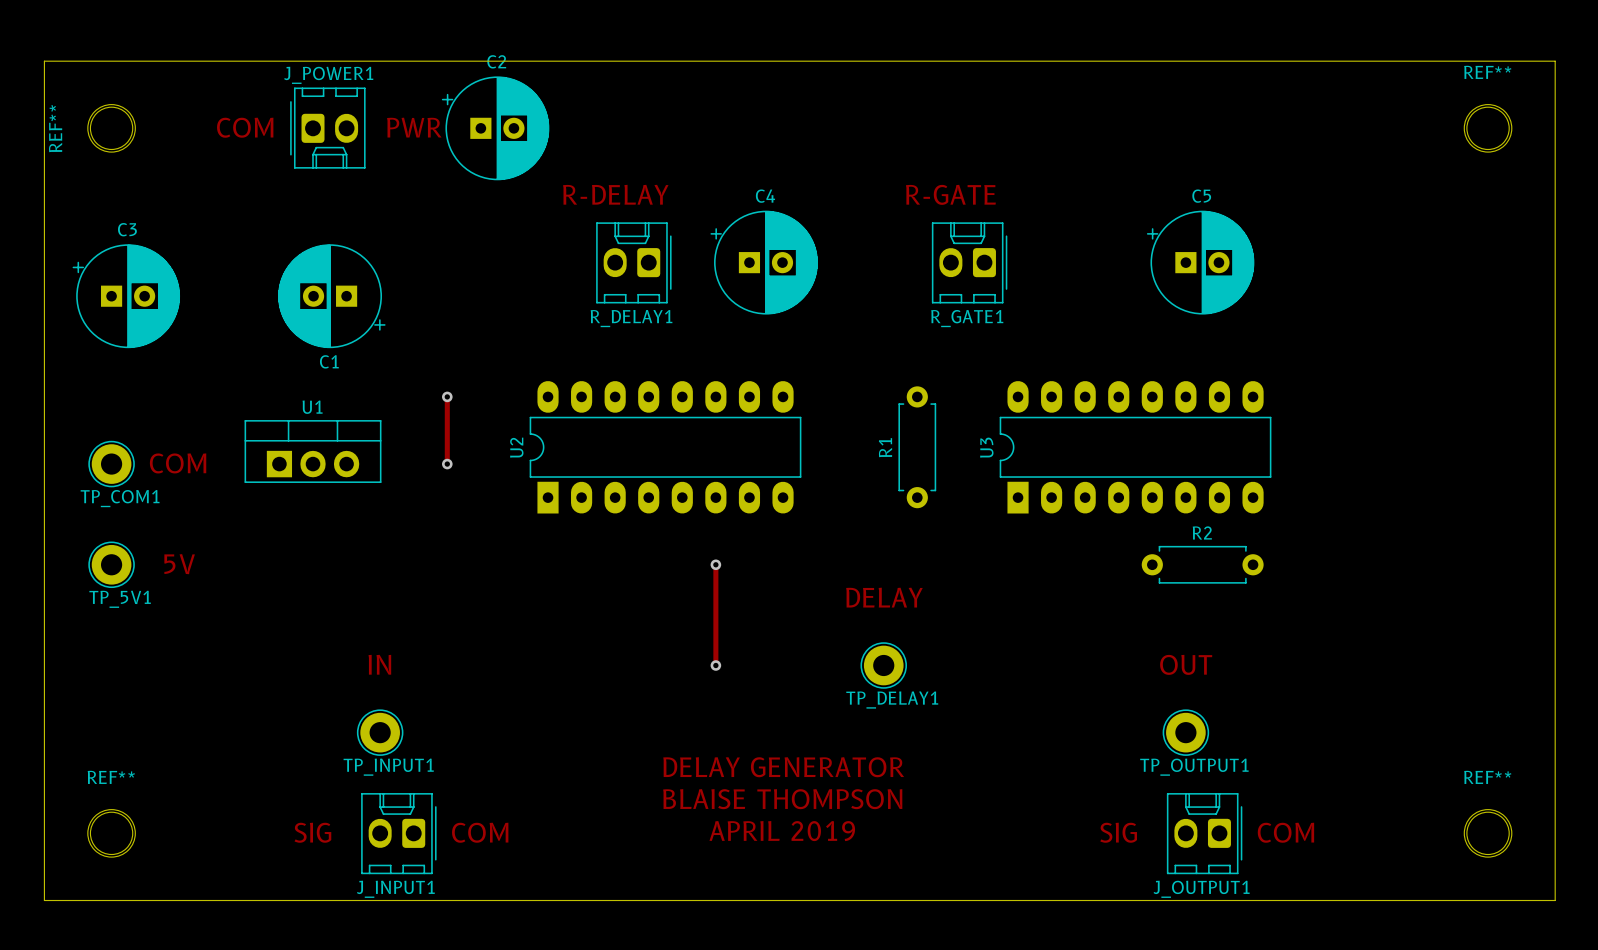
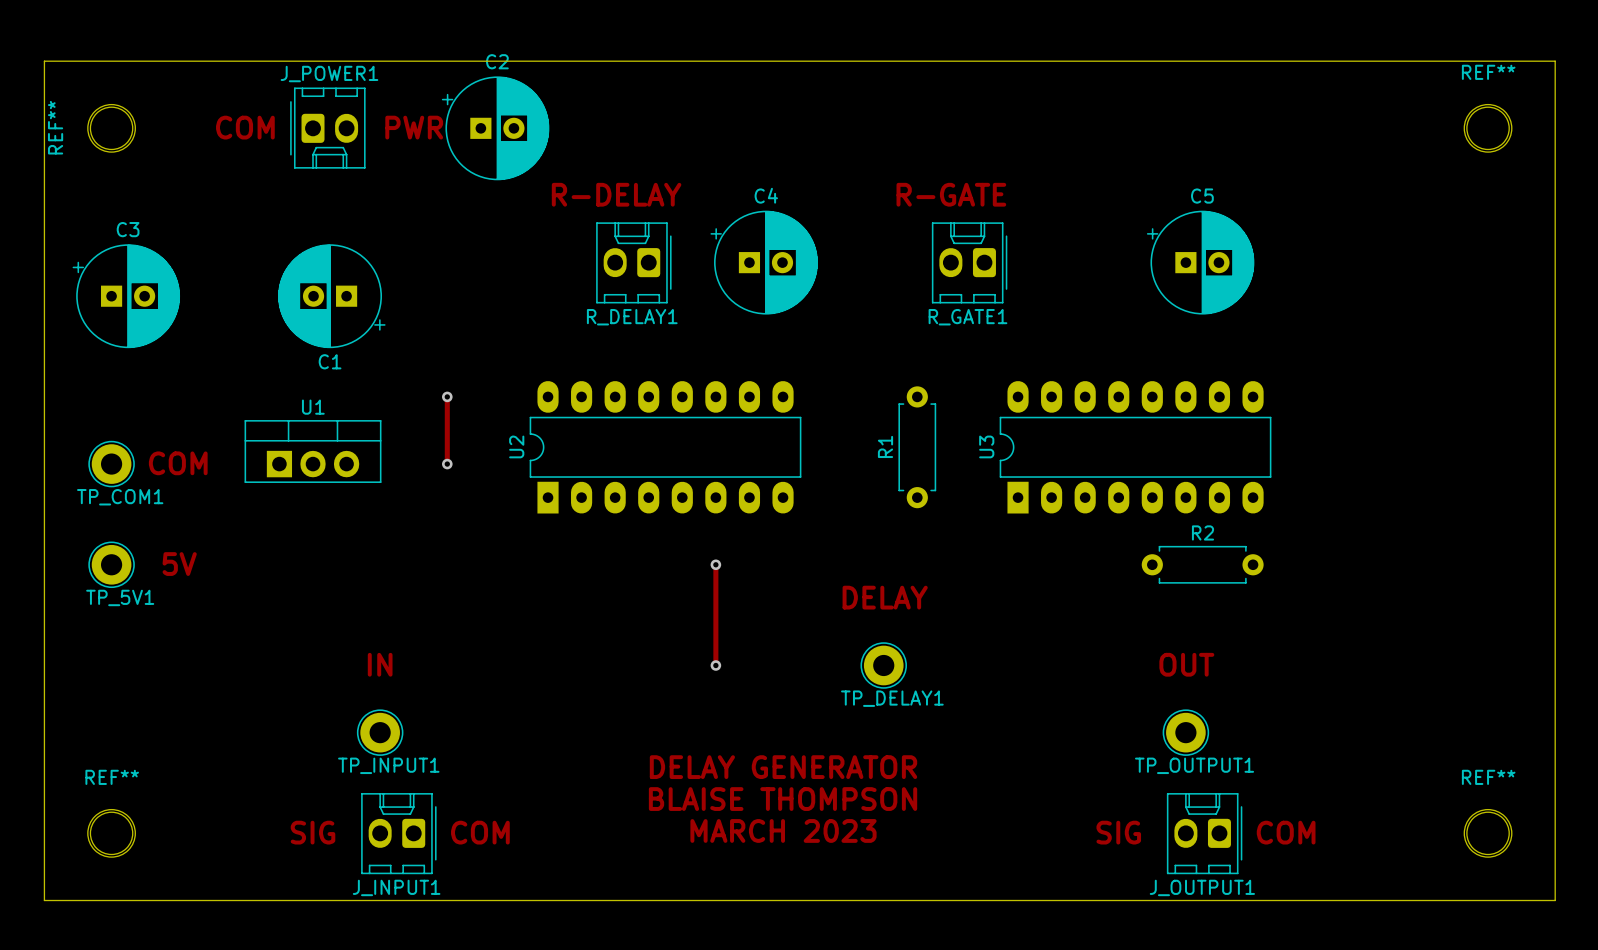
text: APRIL 2019 (782, 831) -> MARCH 2023 (783, 830)

